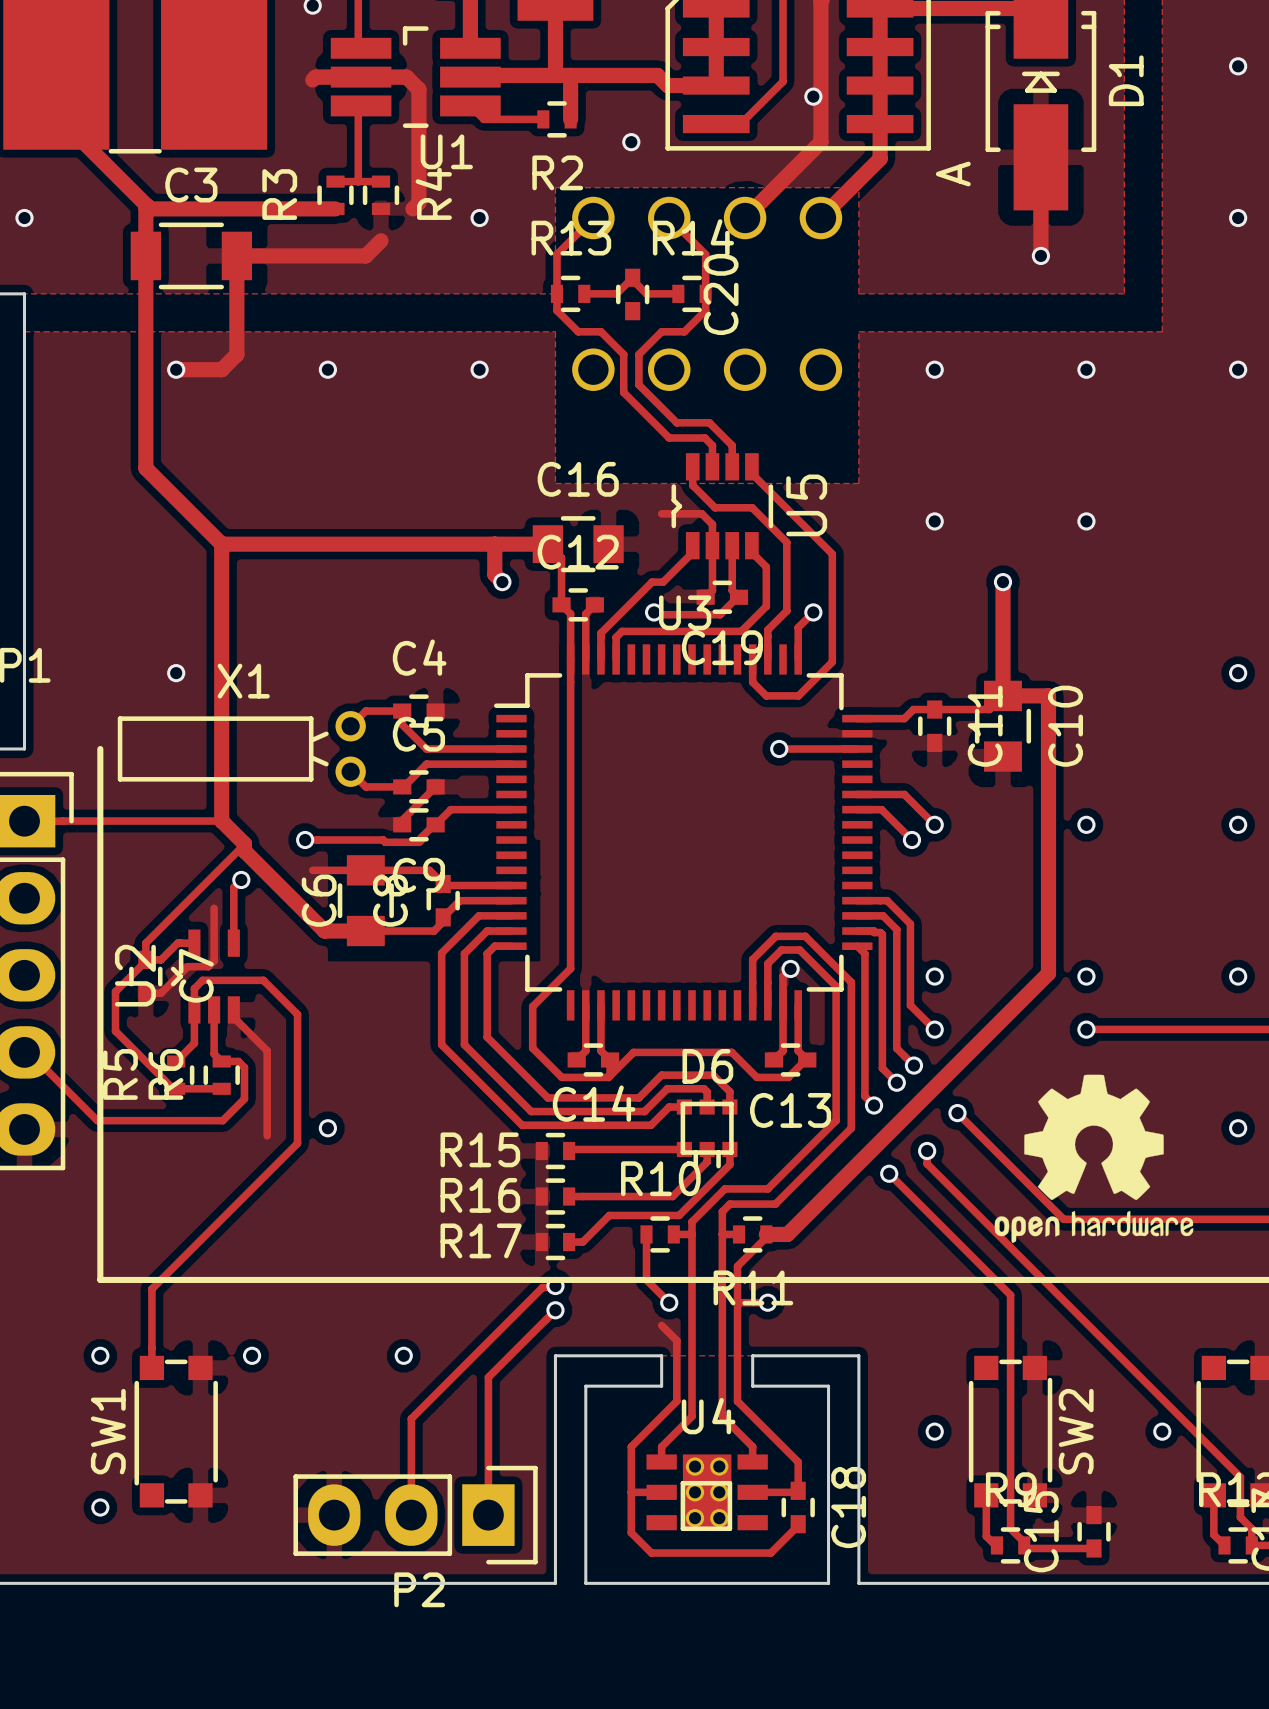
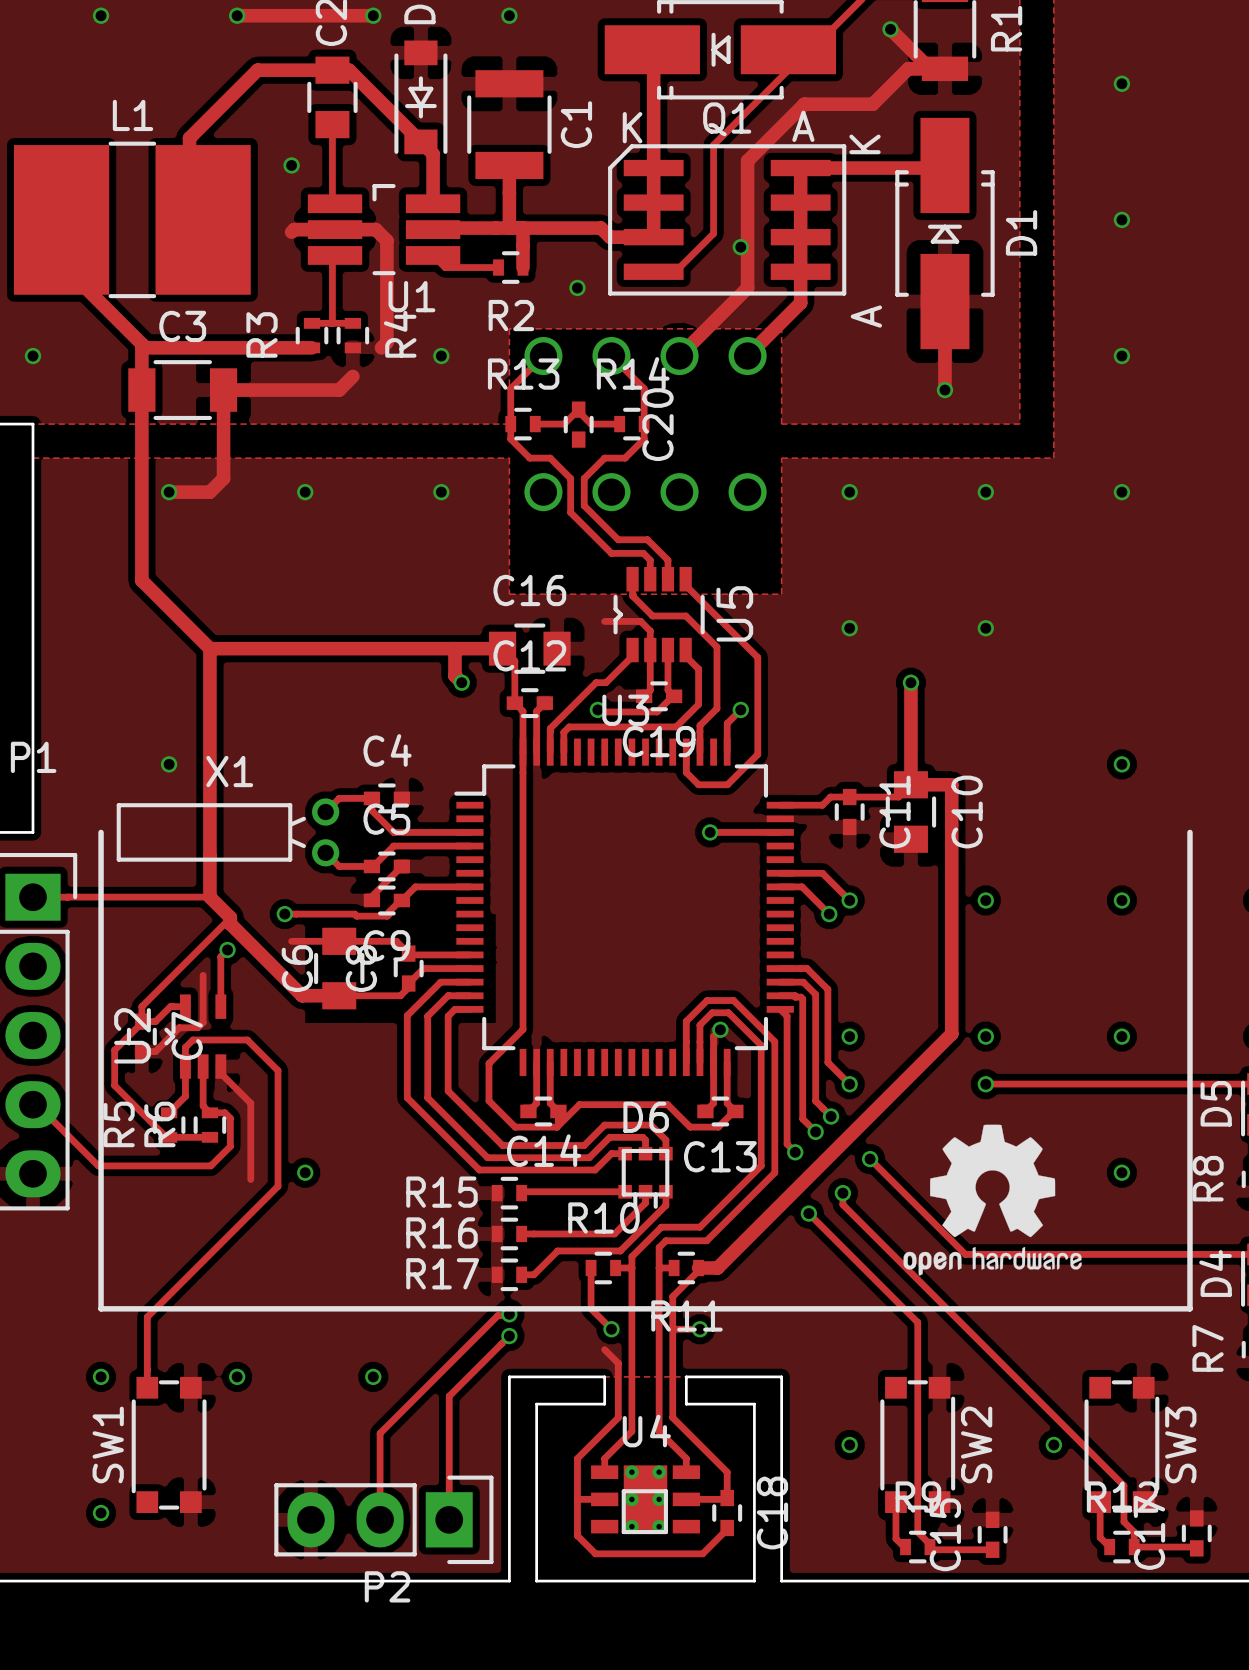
U4 footprint: [646, 1454, 768, 1532] -> [591, 1465, 700, 1535]

